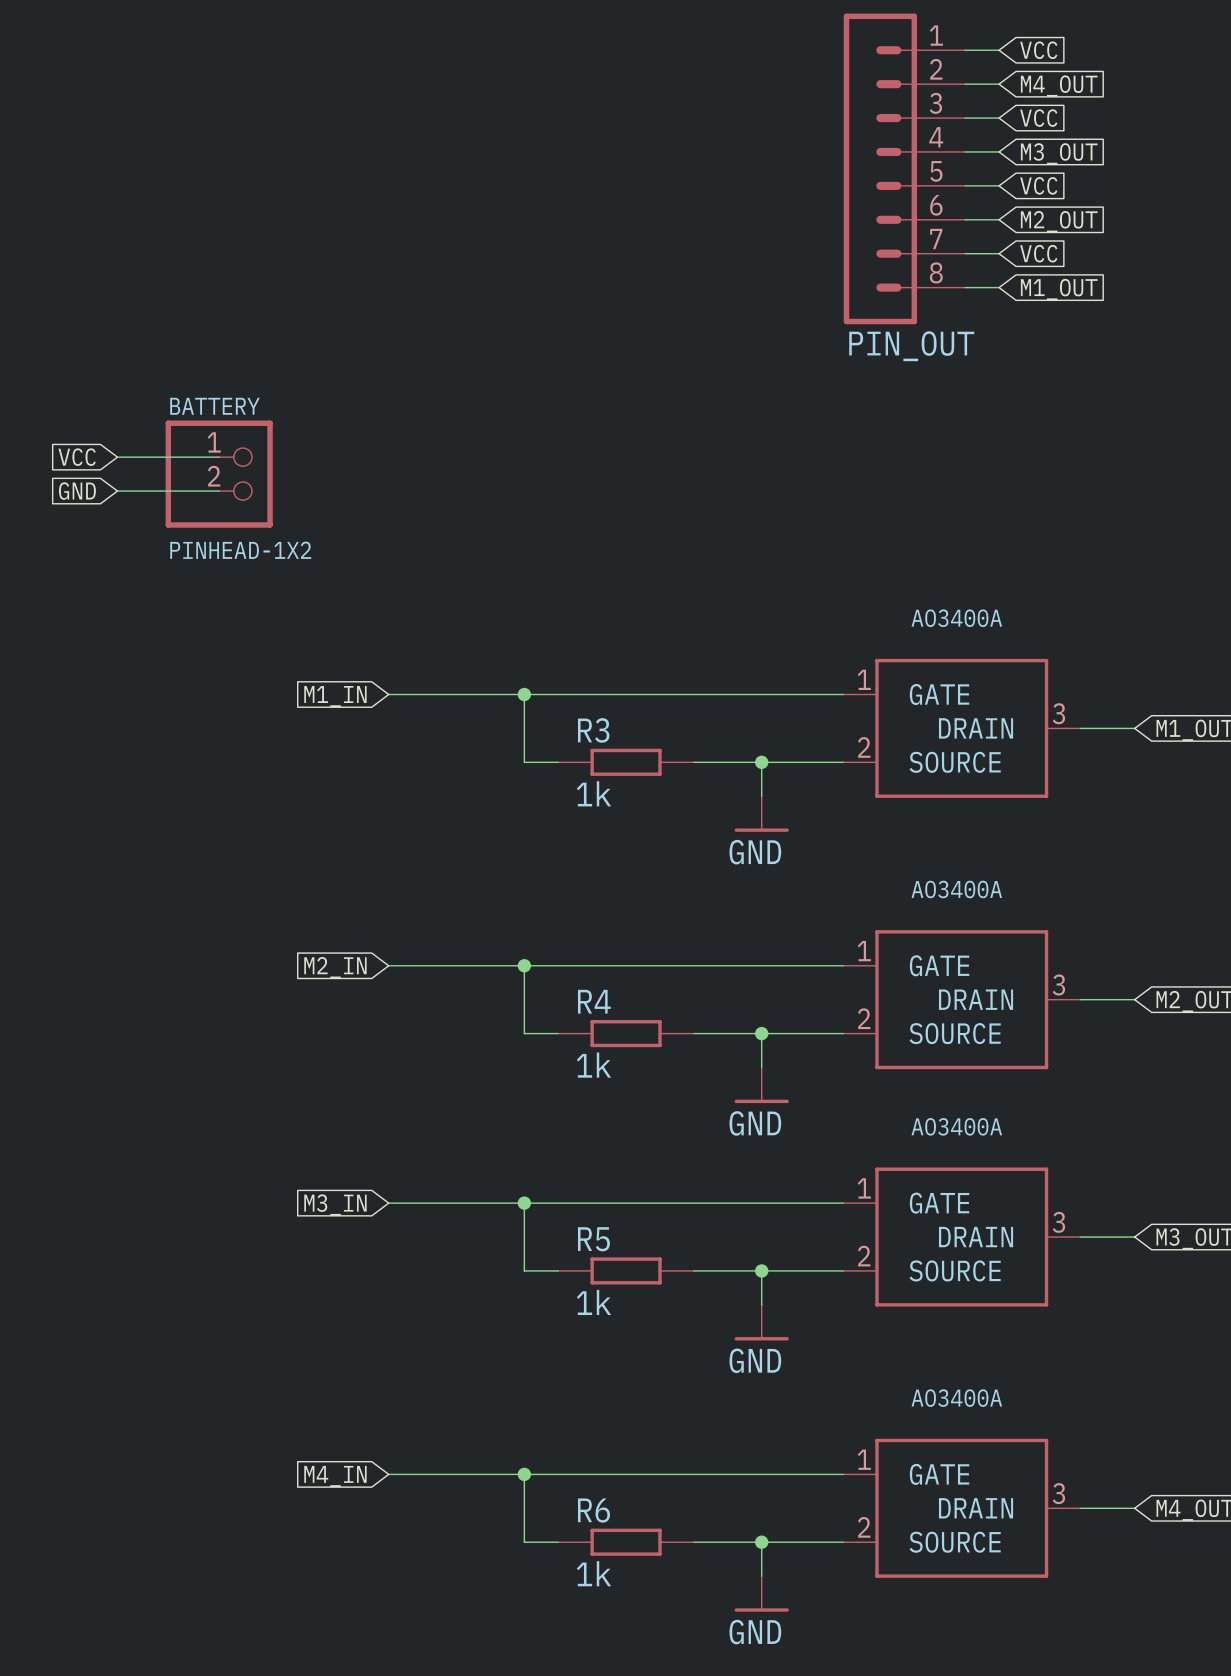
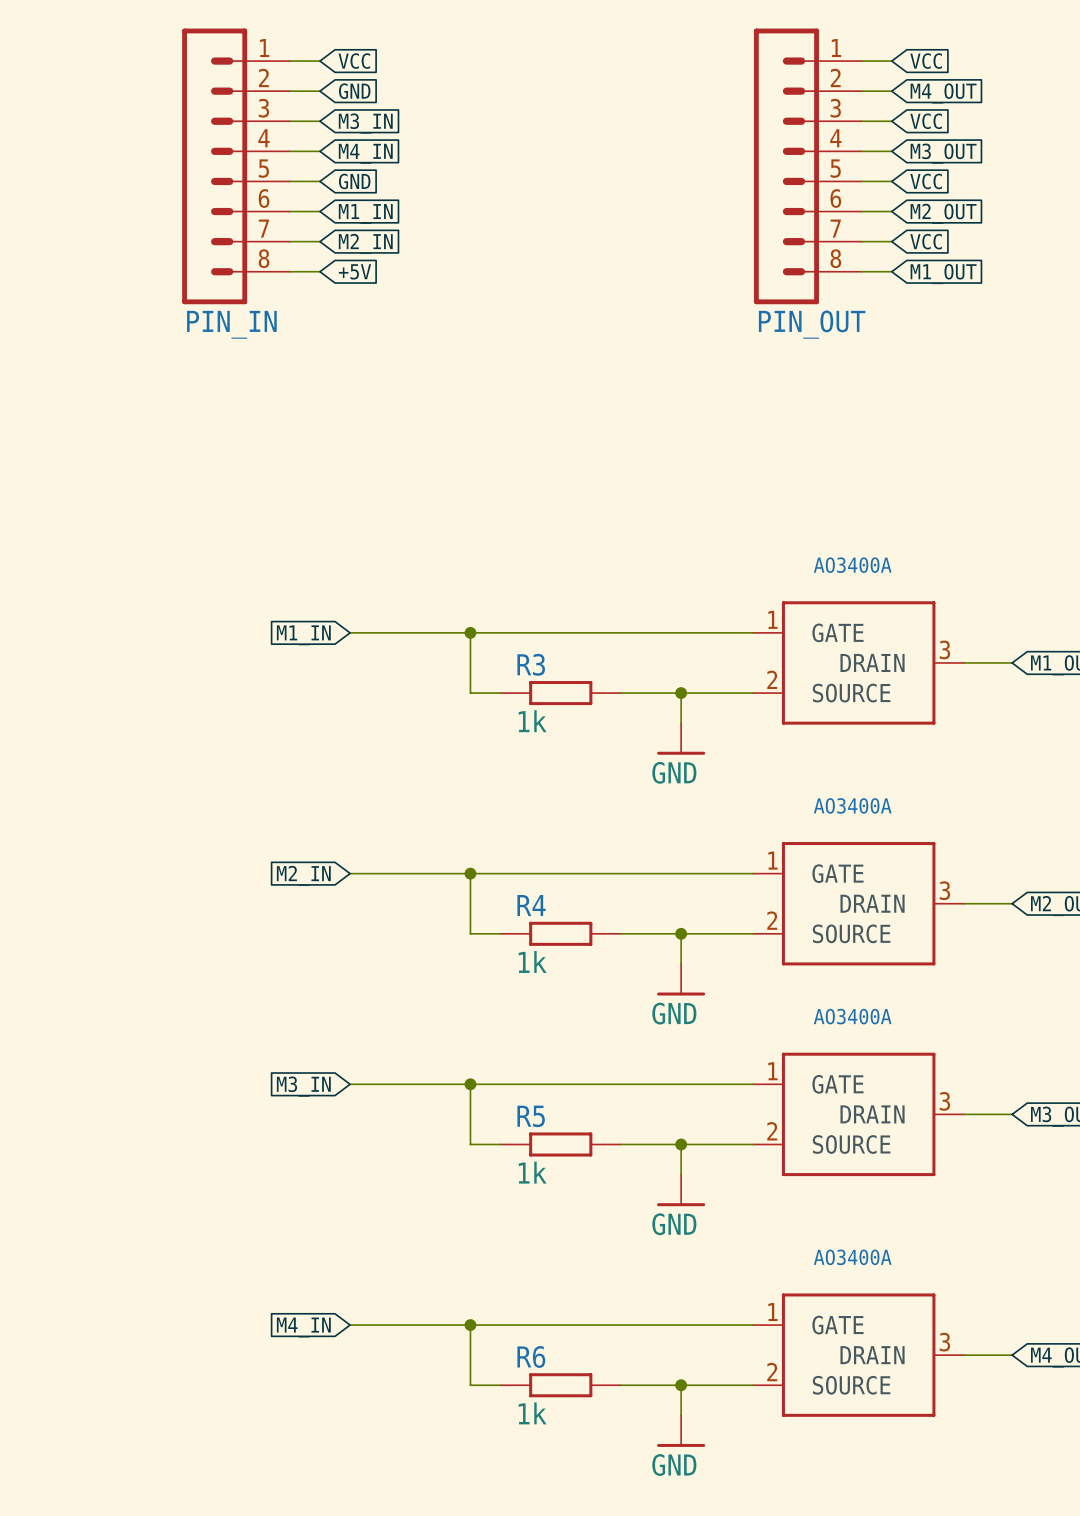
wire: none -> (289, 61) (319, 61)
global label: none -> VCC (354, 61)
wire: none -> (289, 91) (319, 91)
global label: none -> GND (354, 91)
wire: none -> (289, 121) (319, 121)
global label: none -> M3_IN (365, 123)
wire: none -> (289, 151) (319, 151)
global label: none -> M4_IN (365, 153)
PIN_IN: none -> (236, 166)
wire: none -> (289, 181) (319, 181)
global label: none -> GND (354, 181)
wire: none -> (289, 211) (319, 211)
global label: none -> M1_IN (365, 213)
wire: none -> (289, 241) (319, 241)
global label: none -> M2_IN (365, 243)
wire: none -> (289, 271) (319, 271)
global label: none -> +5V (354, 271)
global label: VCC (77, 457) -> none
wire: (117, 457) (219, 457) -> none
BATTERY: PINHEAD-1X2 (219, 474) -> none
global label: GND (77, 491) -> none
wire: (117, 491) (219, 491) -> none

